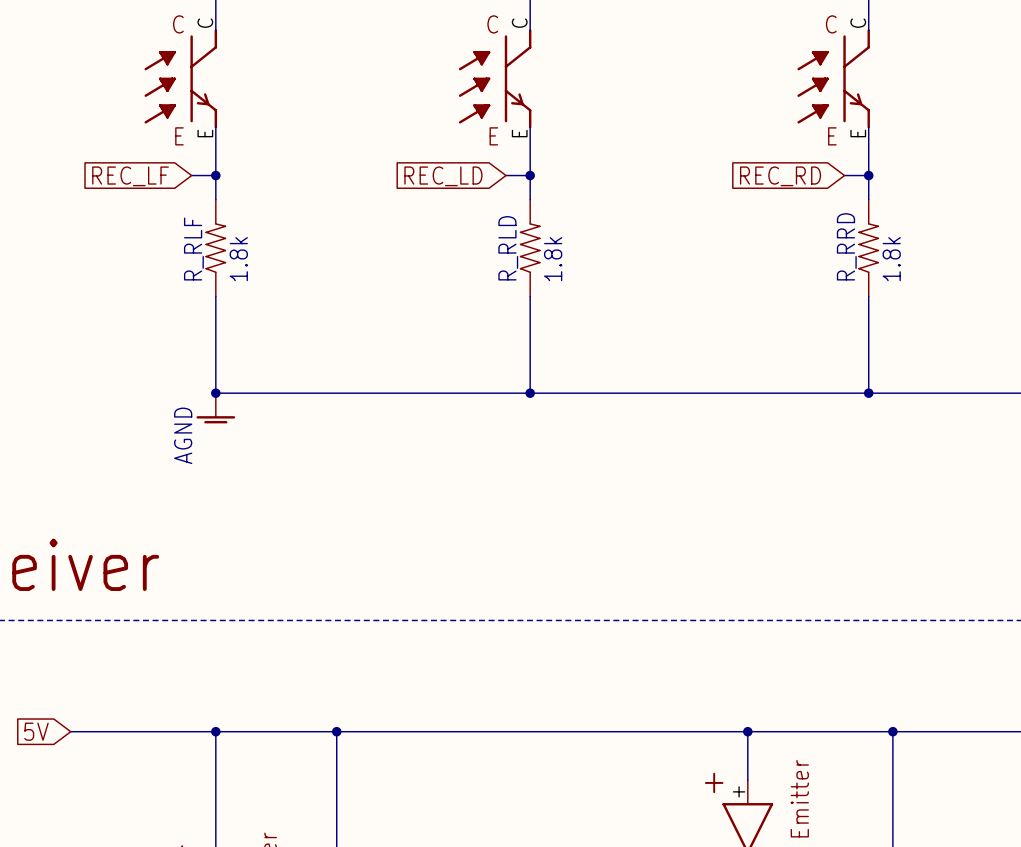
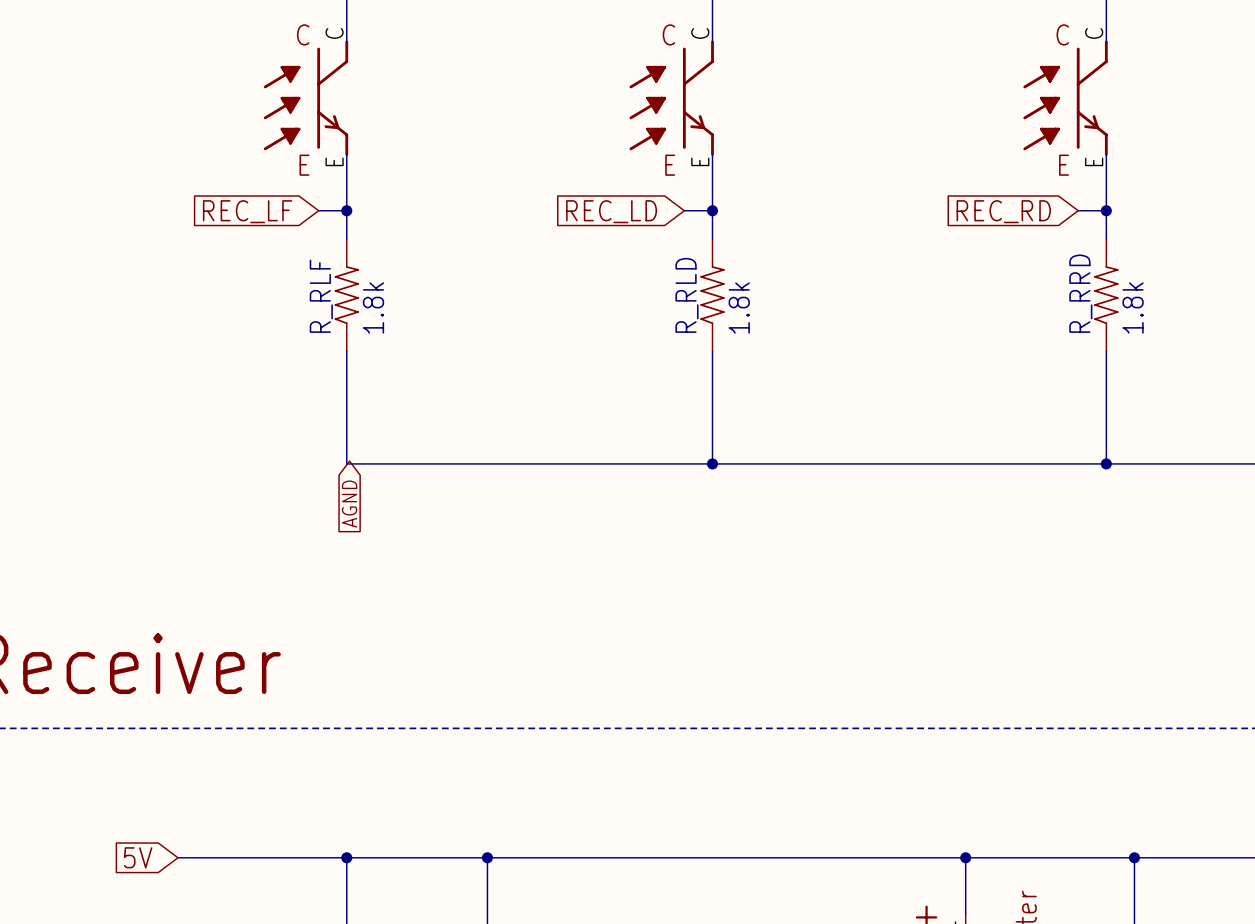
junction: (215, 393) -> none
power symbol: AGND (215, 408) -> none
global label: none -> AGND (349, 504)

